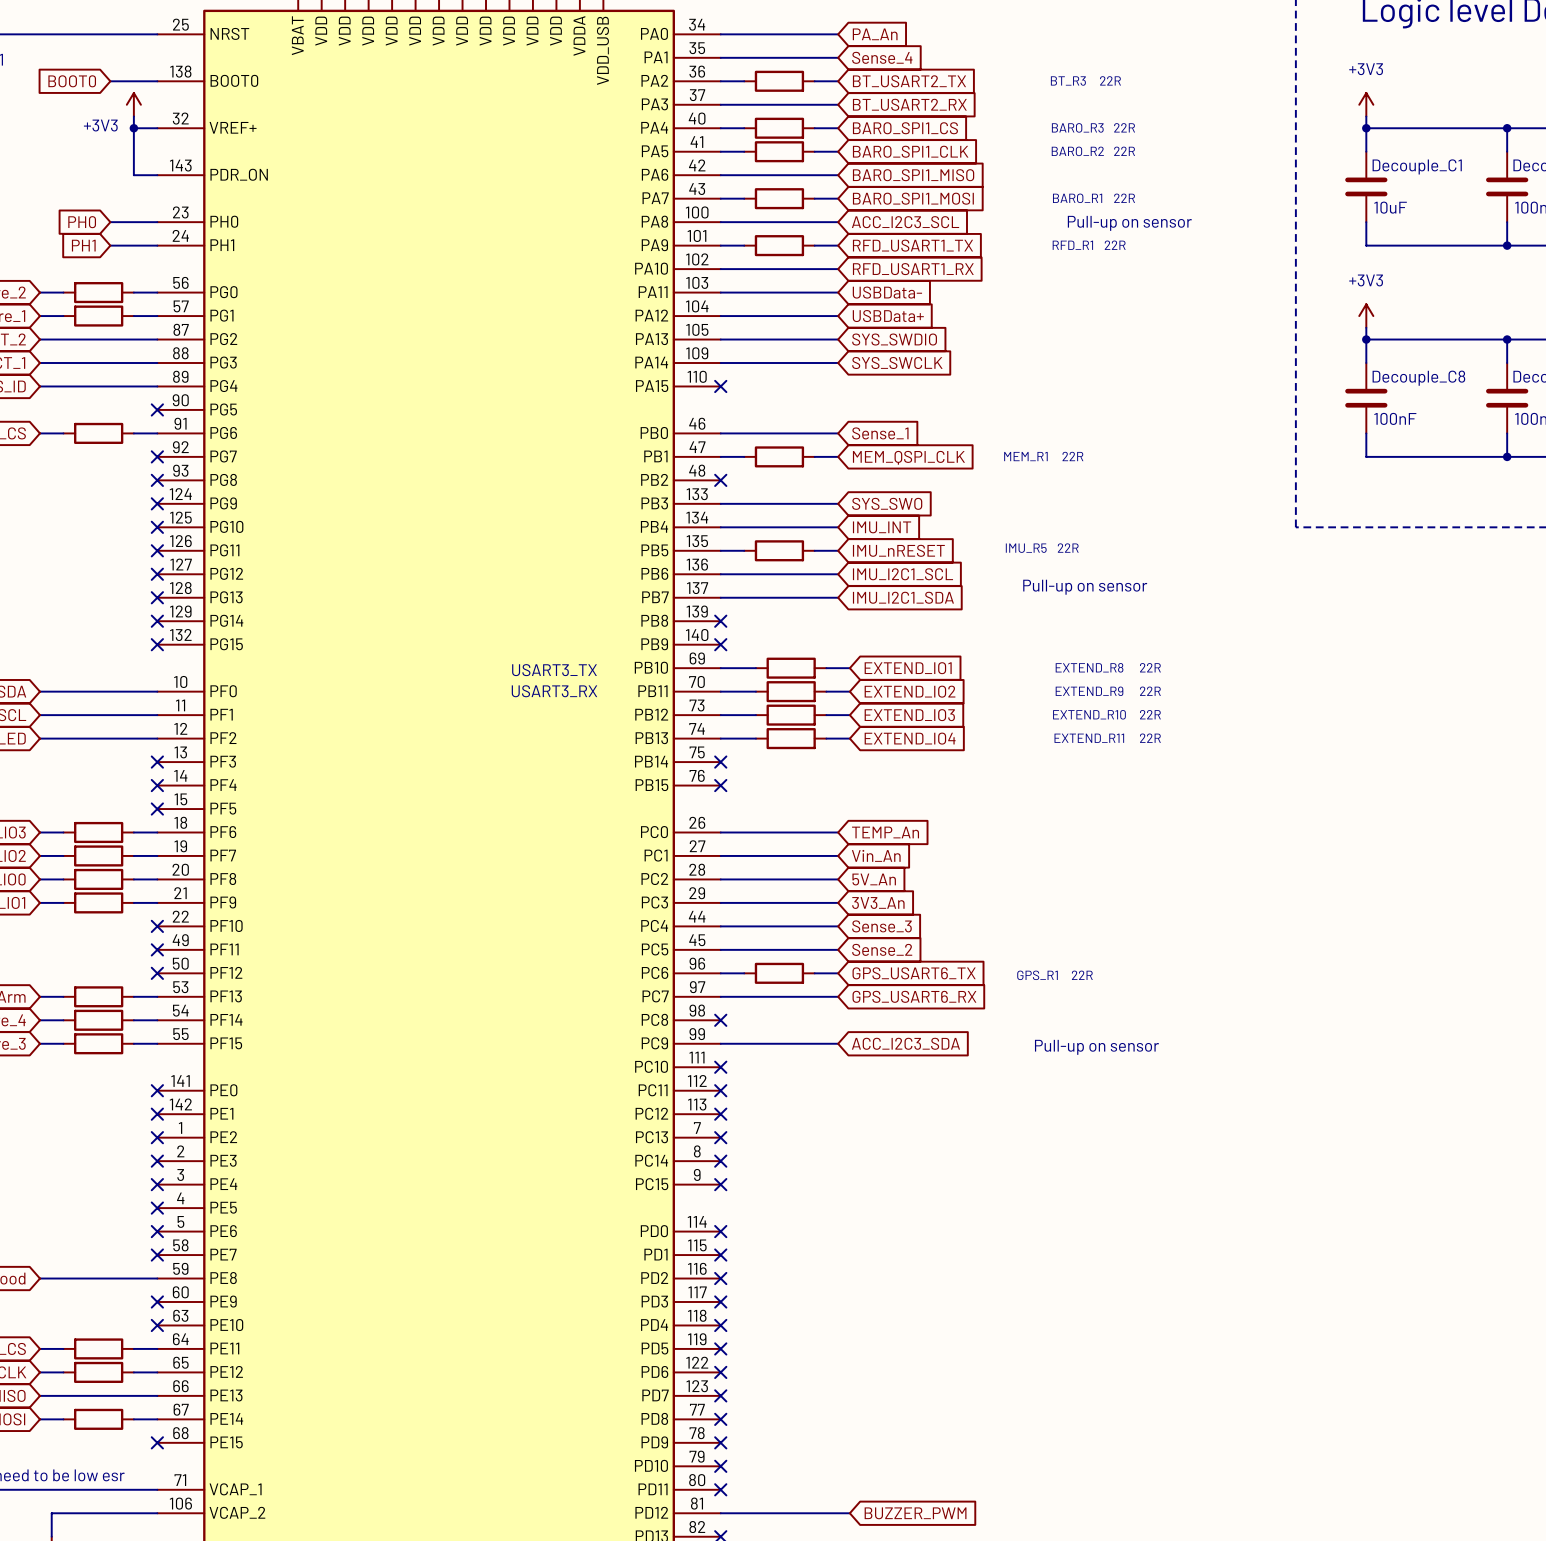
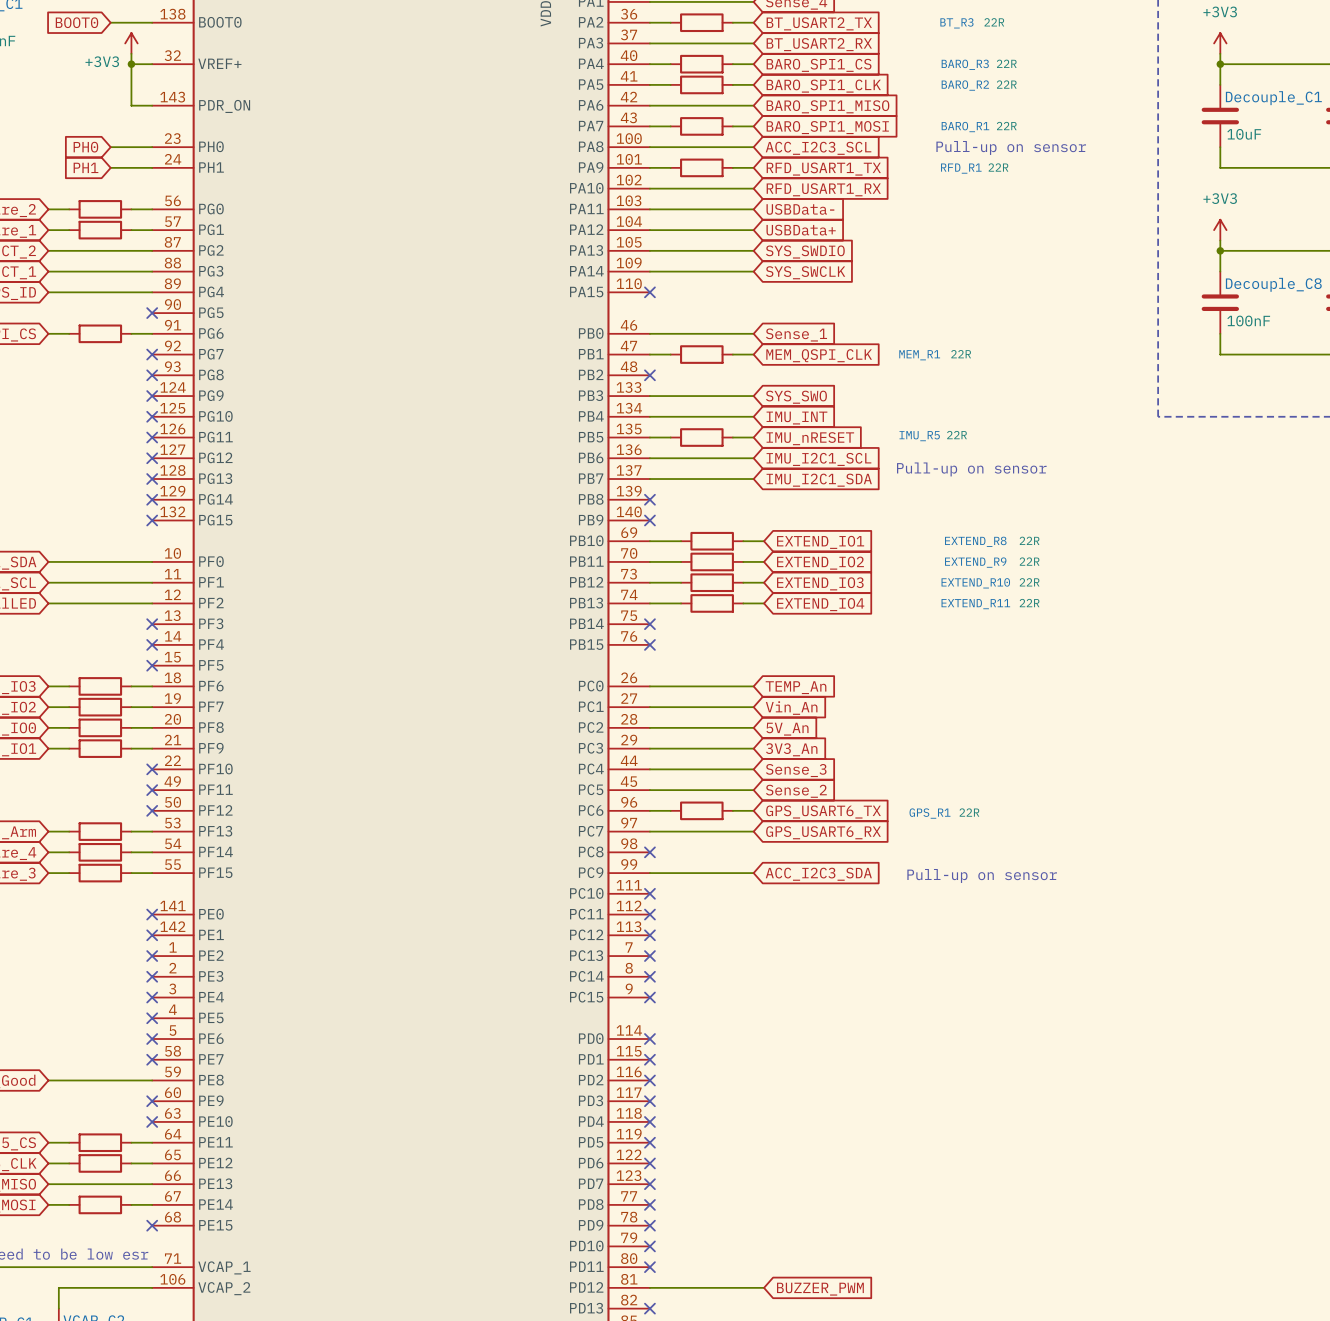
text: USART3_TX (554, 670) -> none
text: USART3_RX (554, 691) -> none

